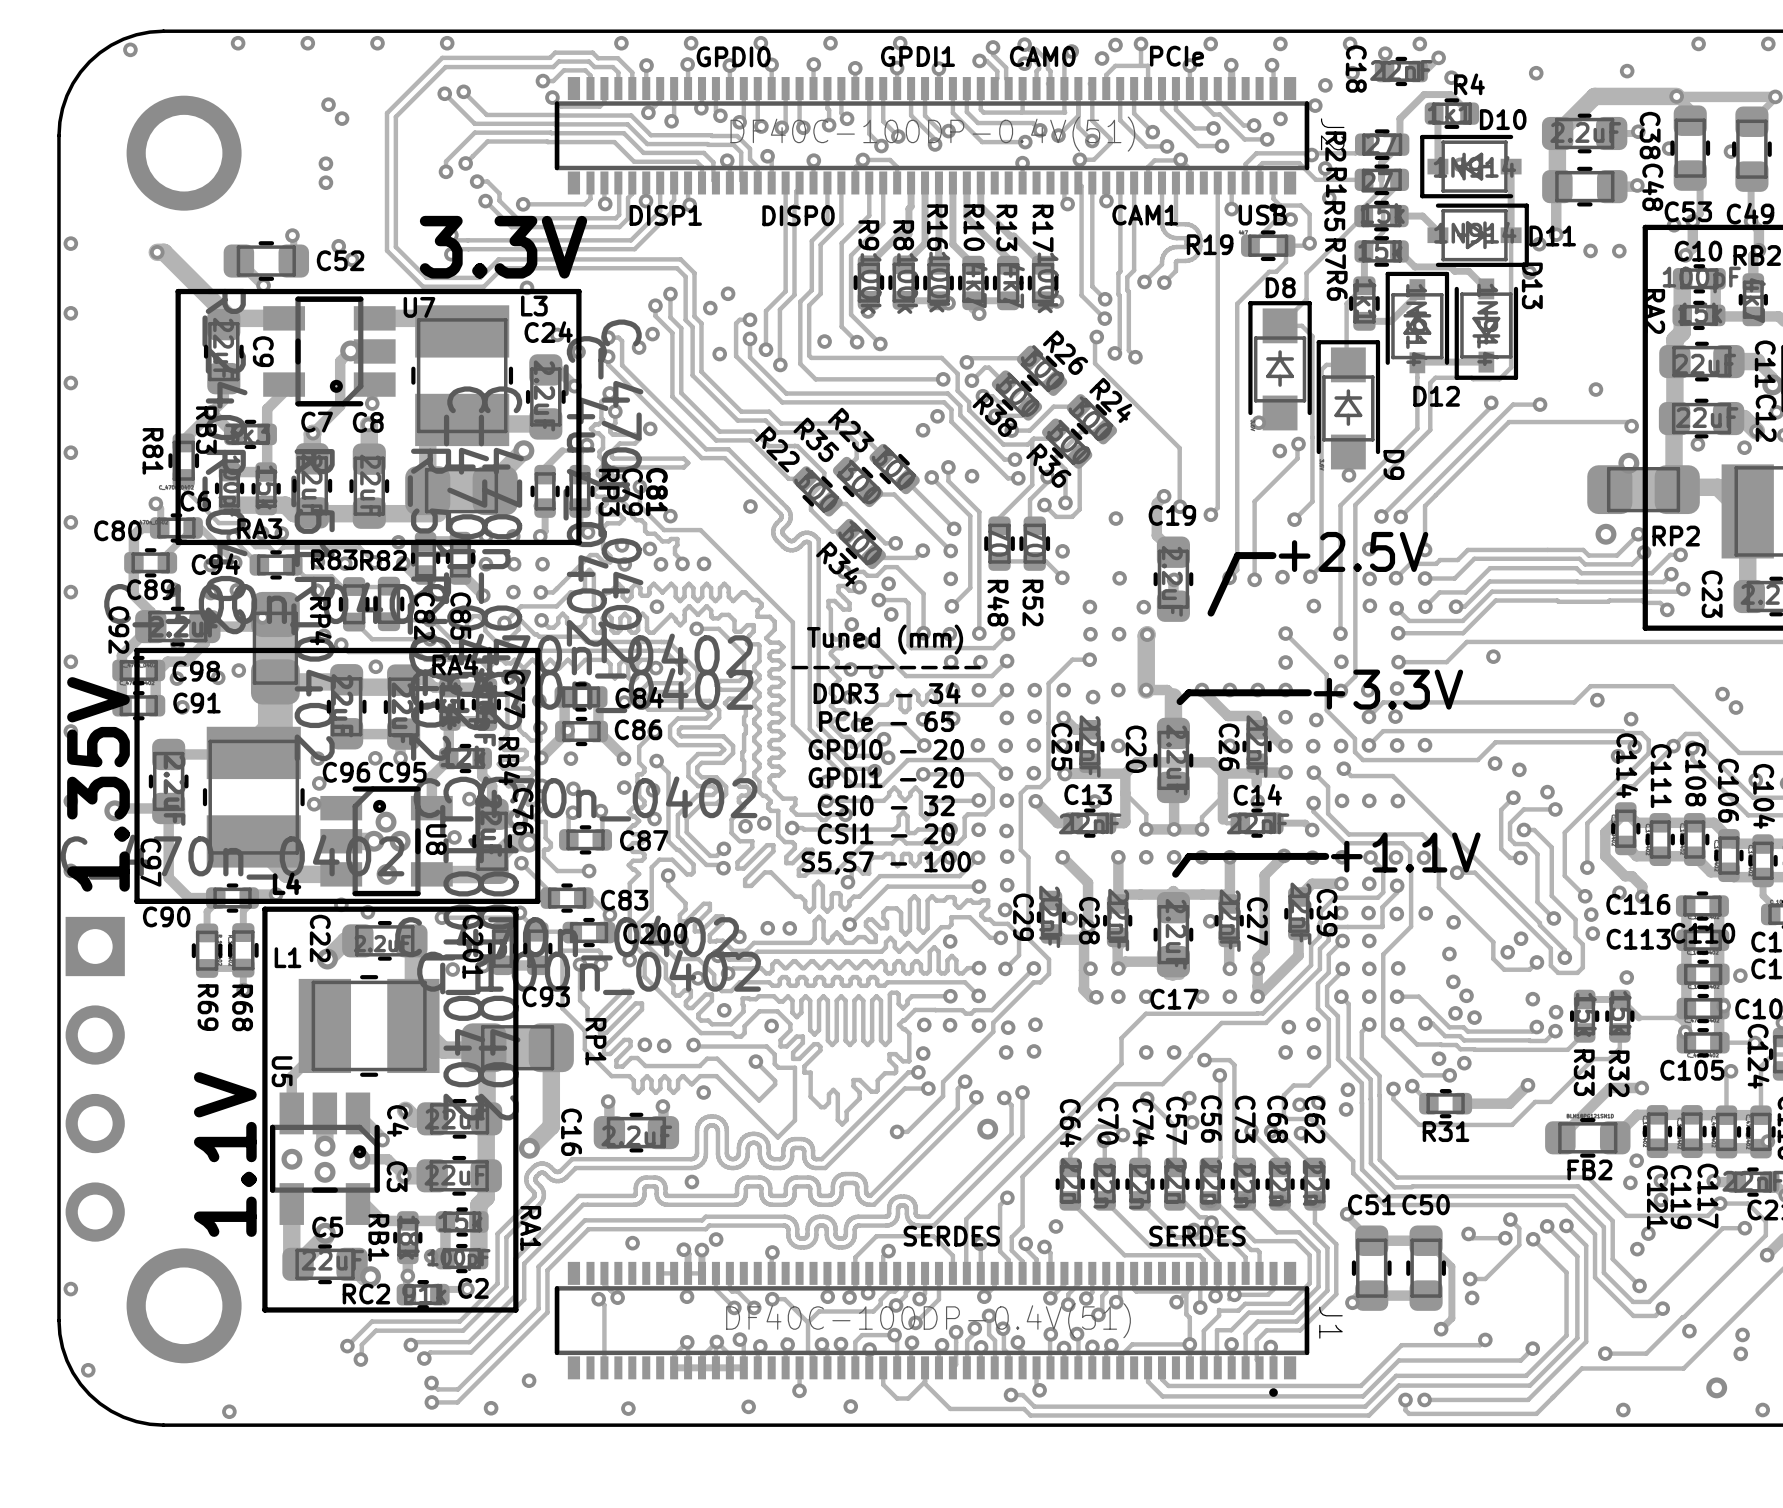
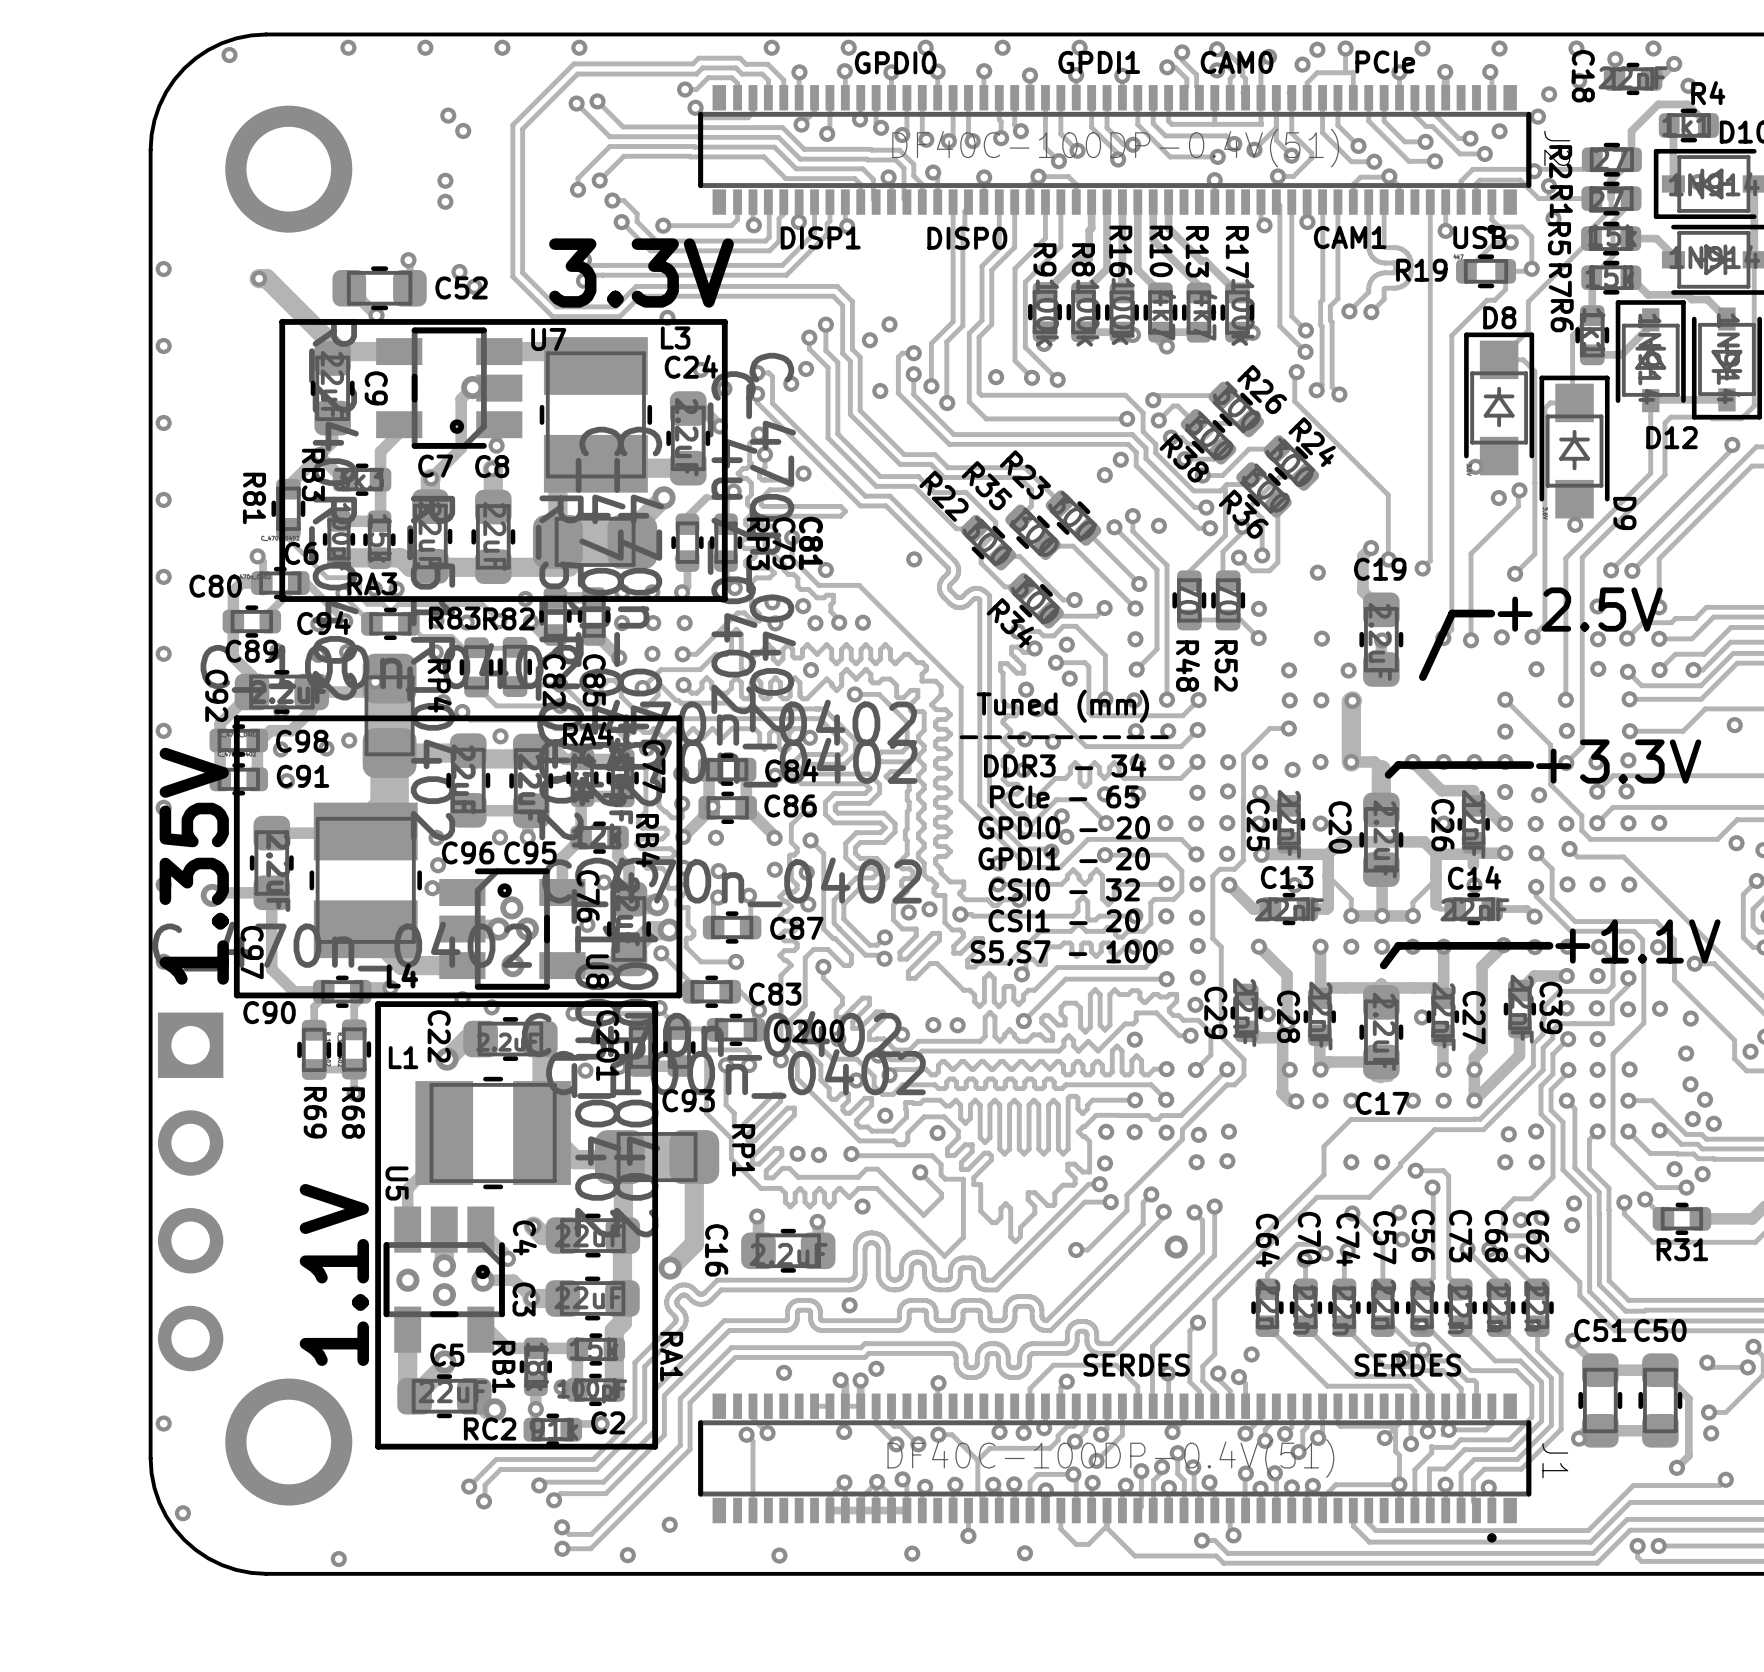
C76 name position: C76 (523, 811) -> C76 (588, 896)
U8 name position: U8 (436, 839) -> U8 (597, 971)

